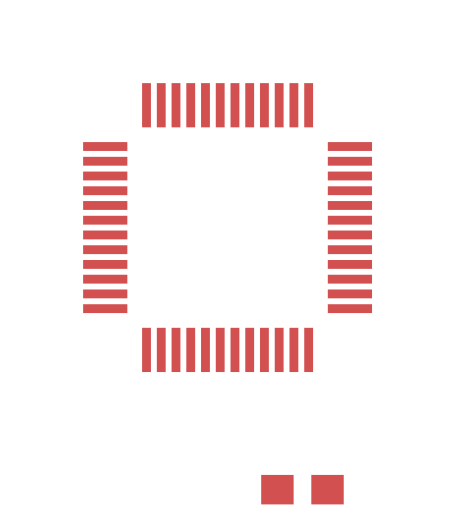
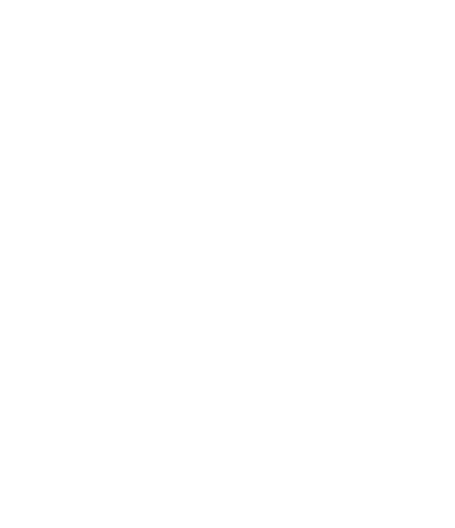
part: (227, 227) -> none
part: (302, 489) -> none

